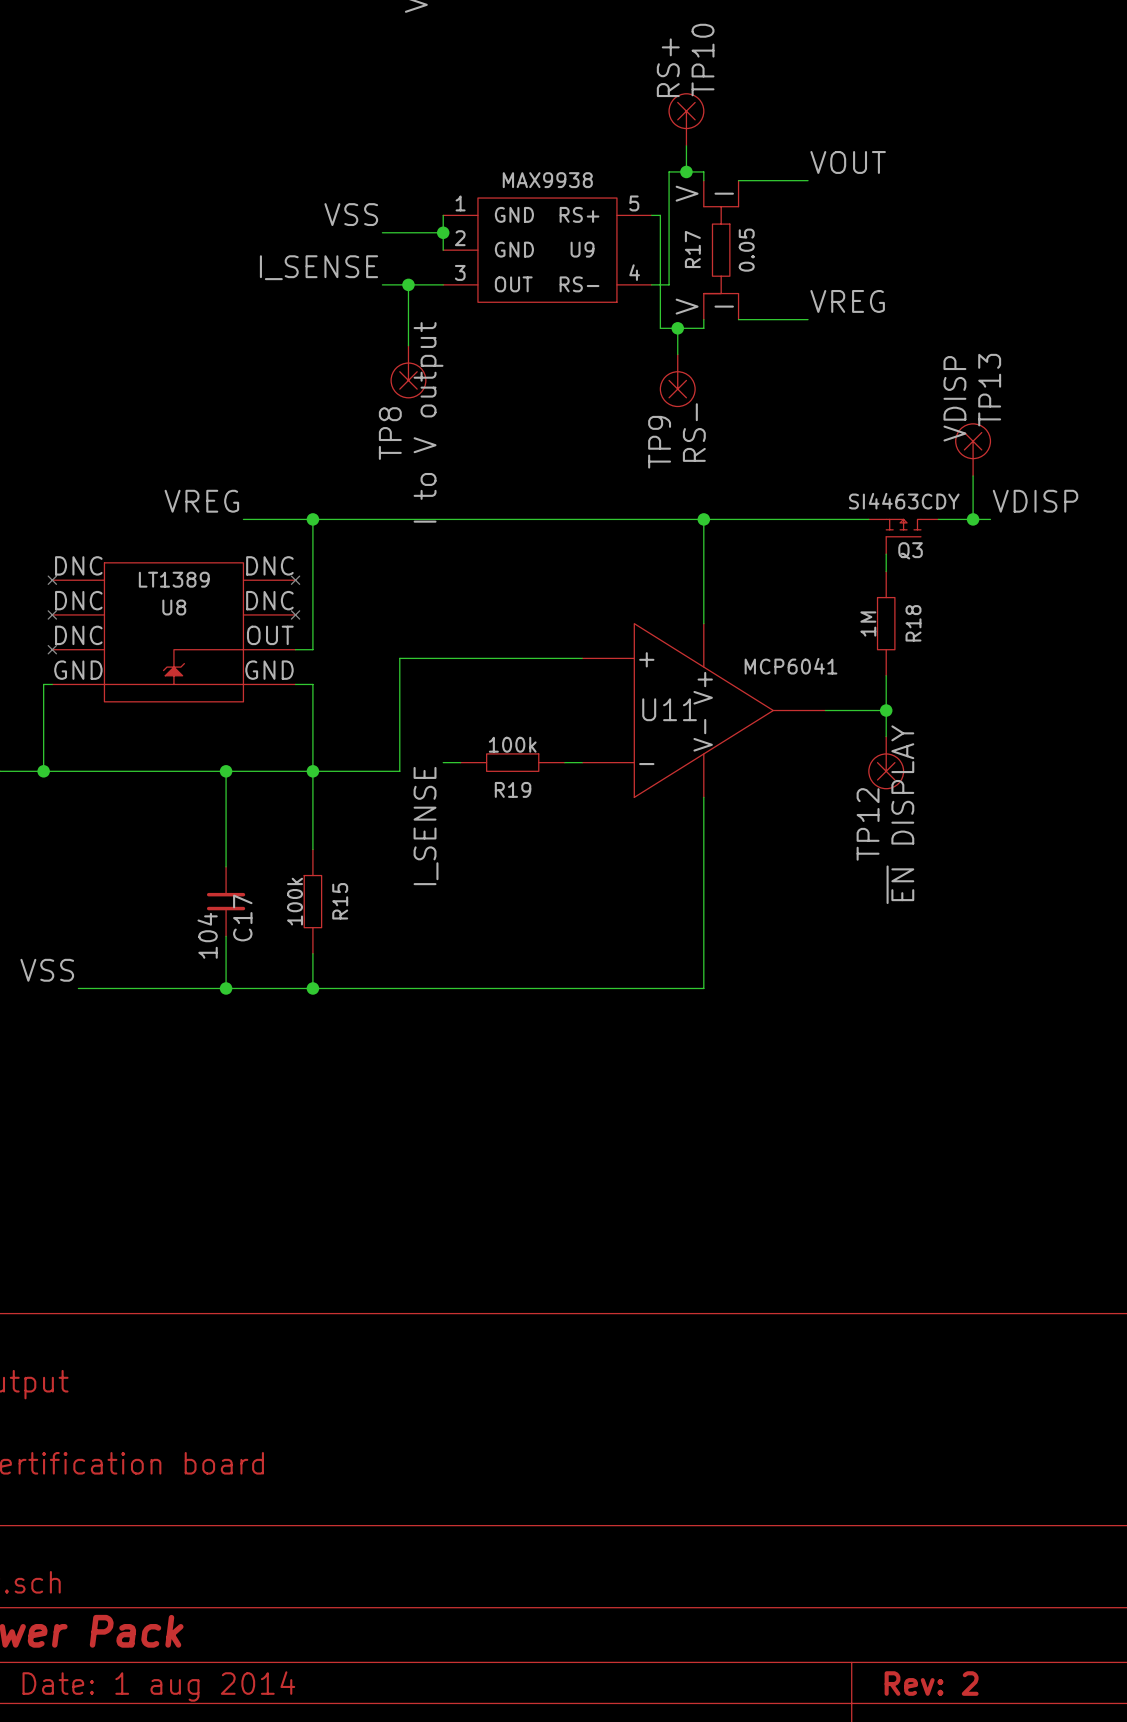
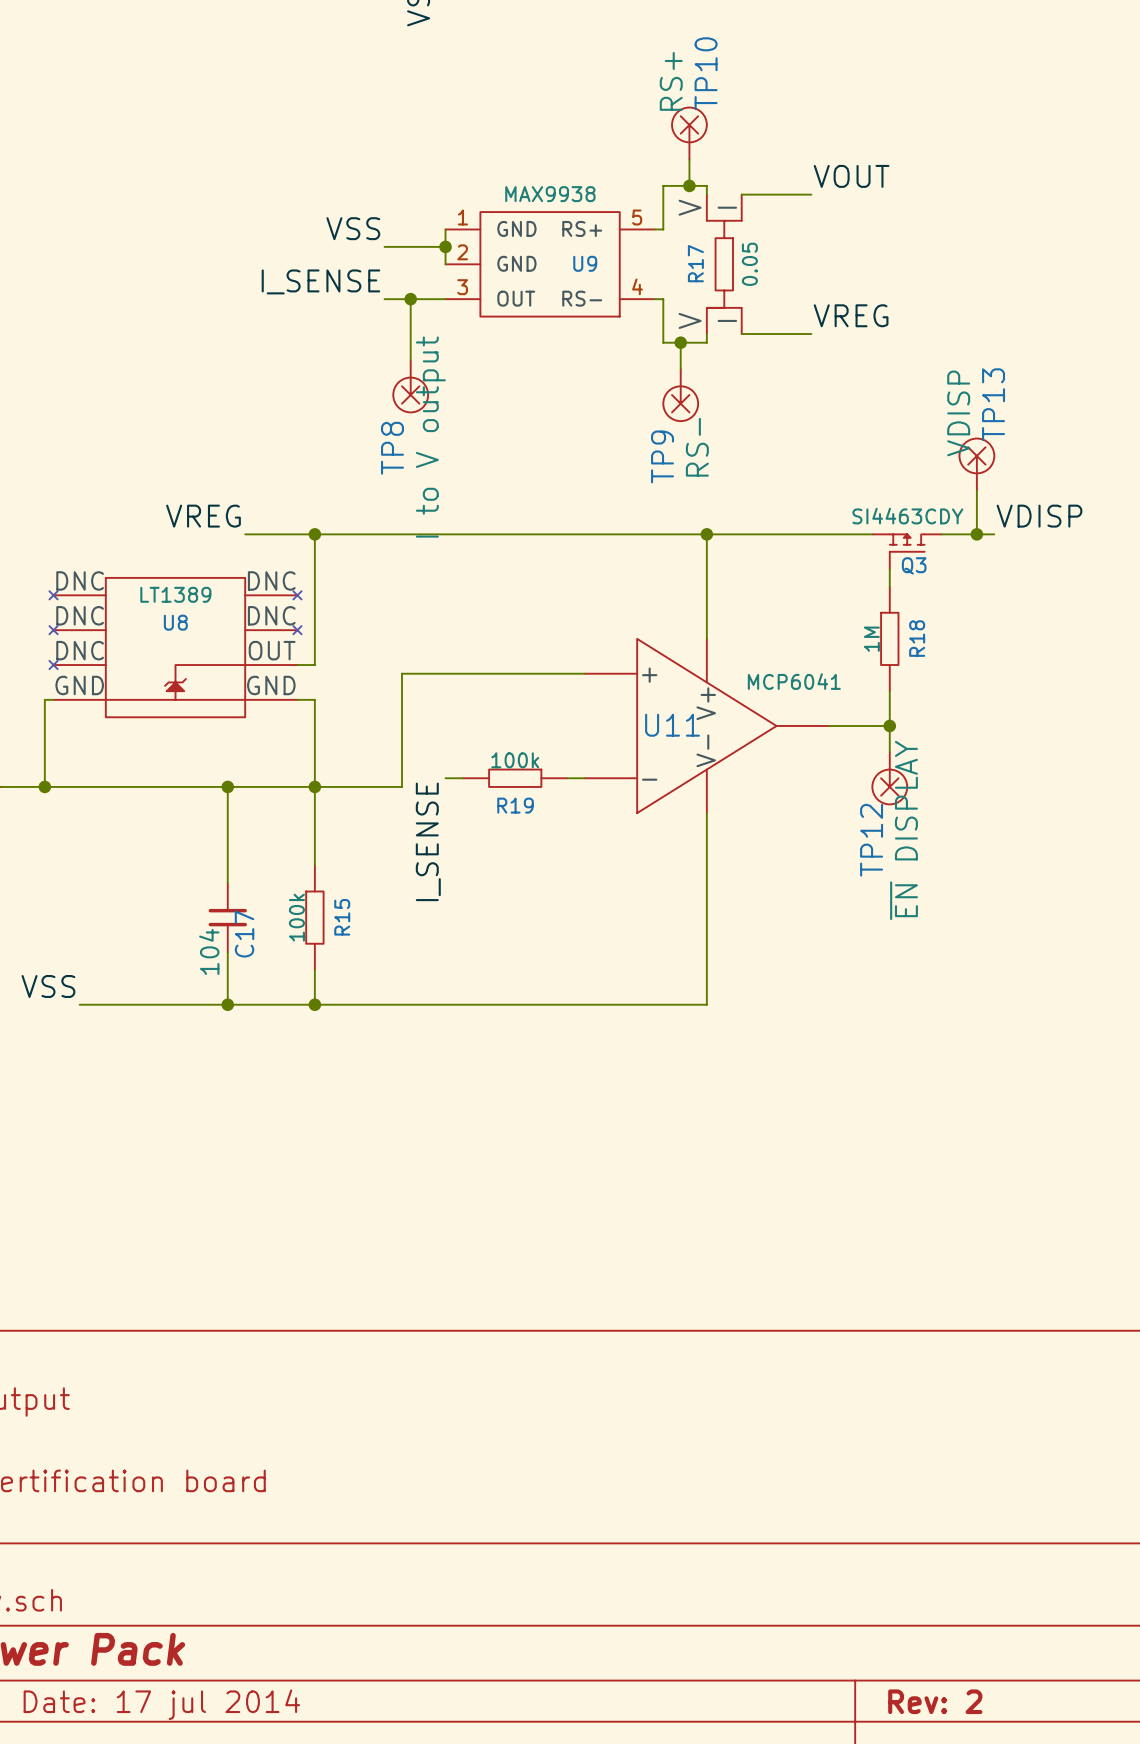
wire: (669, 171) (669, 284) (660, 284) (660, 215) -> (672, 185) (663, 185) (663, 229)
title block: Date: 1 aug 2014 (158, 1686) -> Date: 17 jul 2014 (161, 1704)

